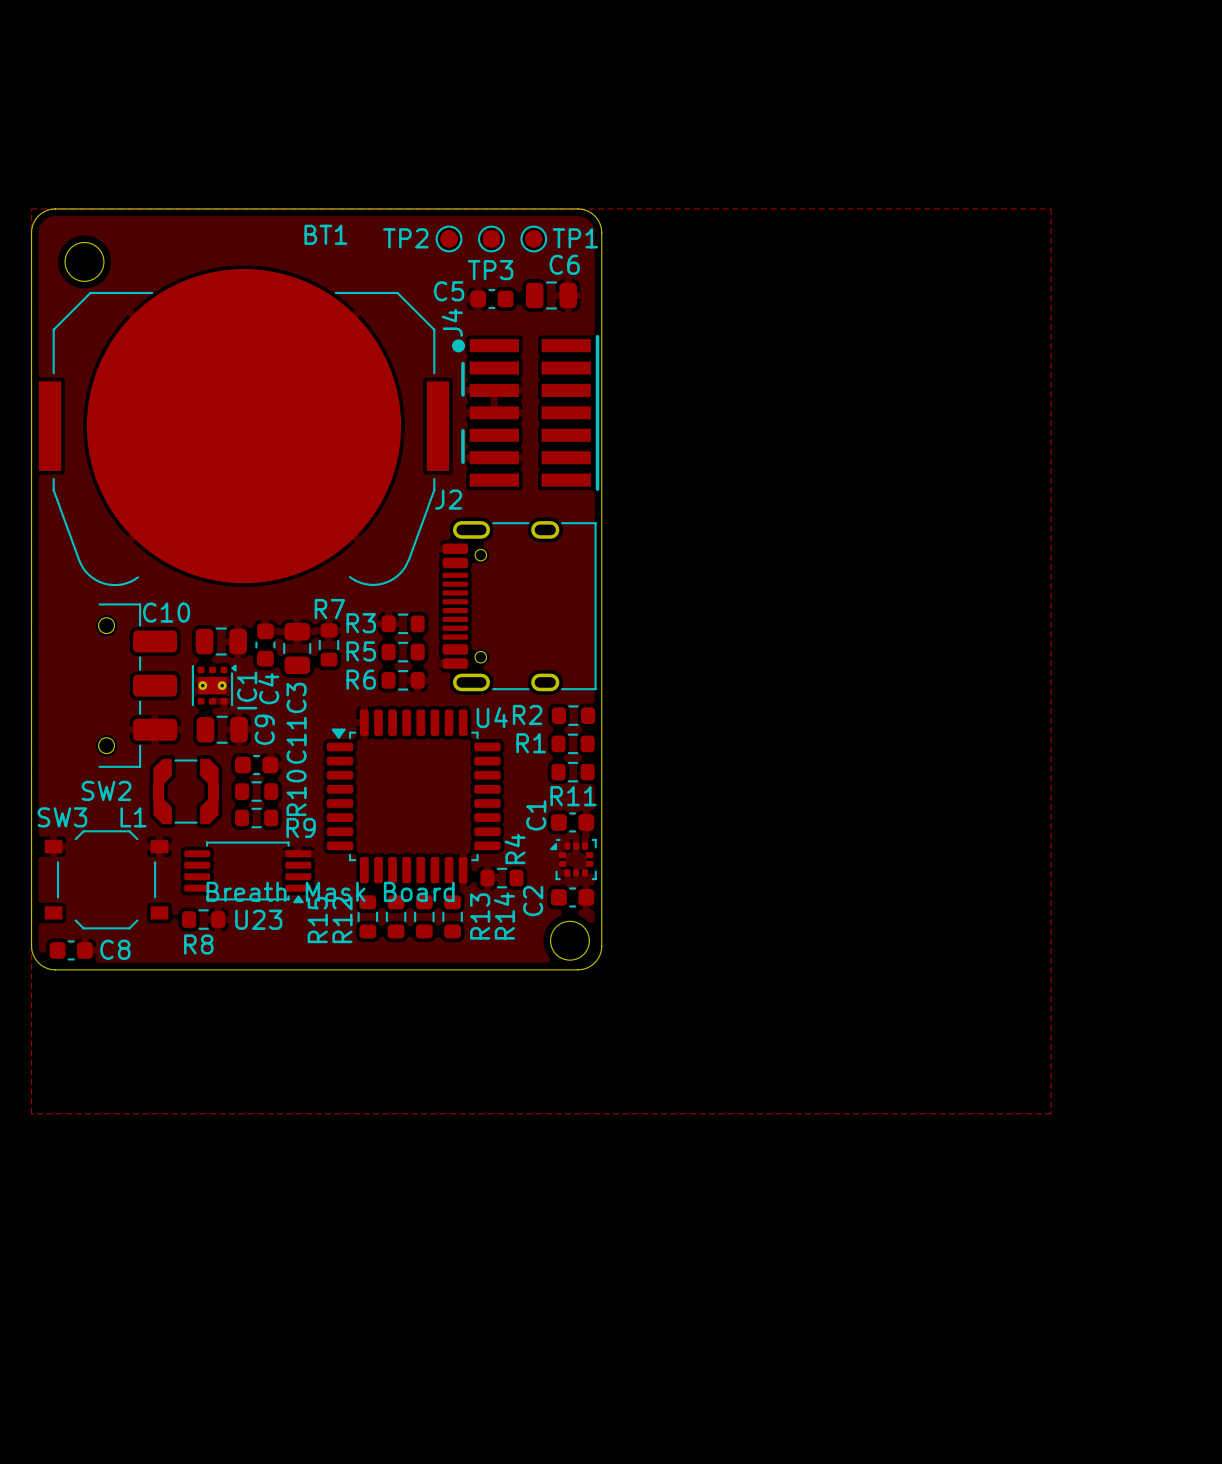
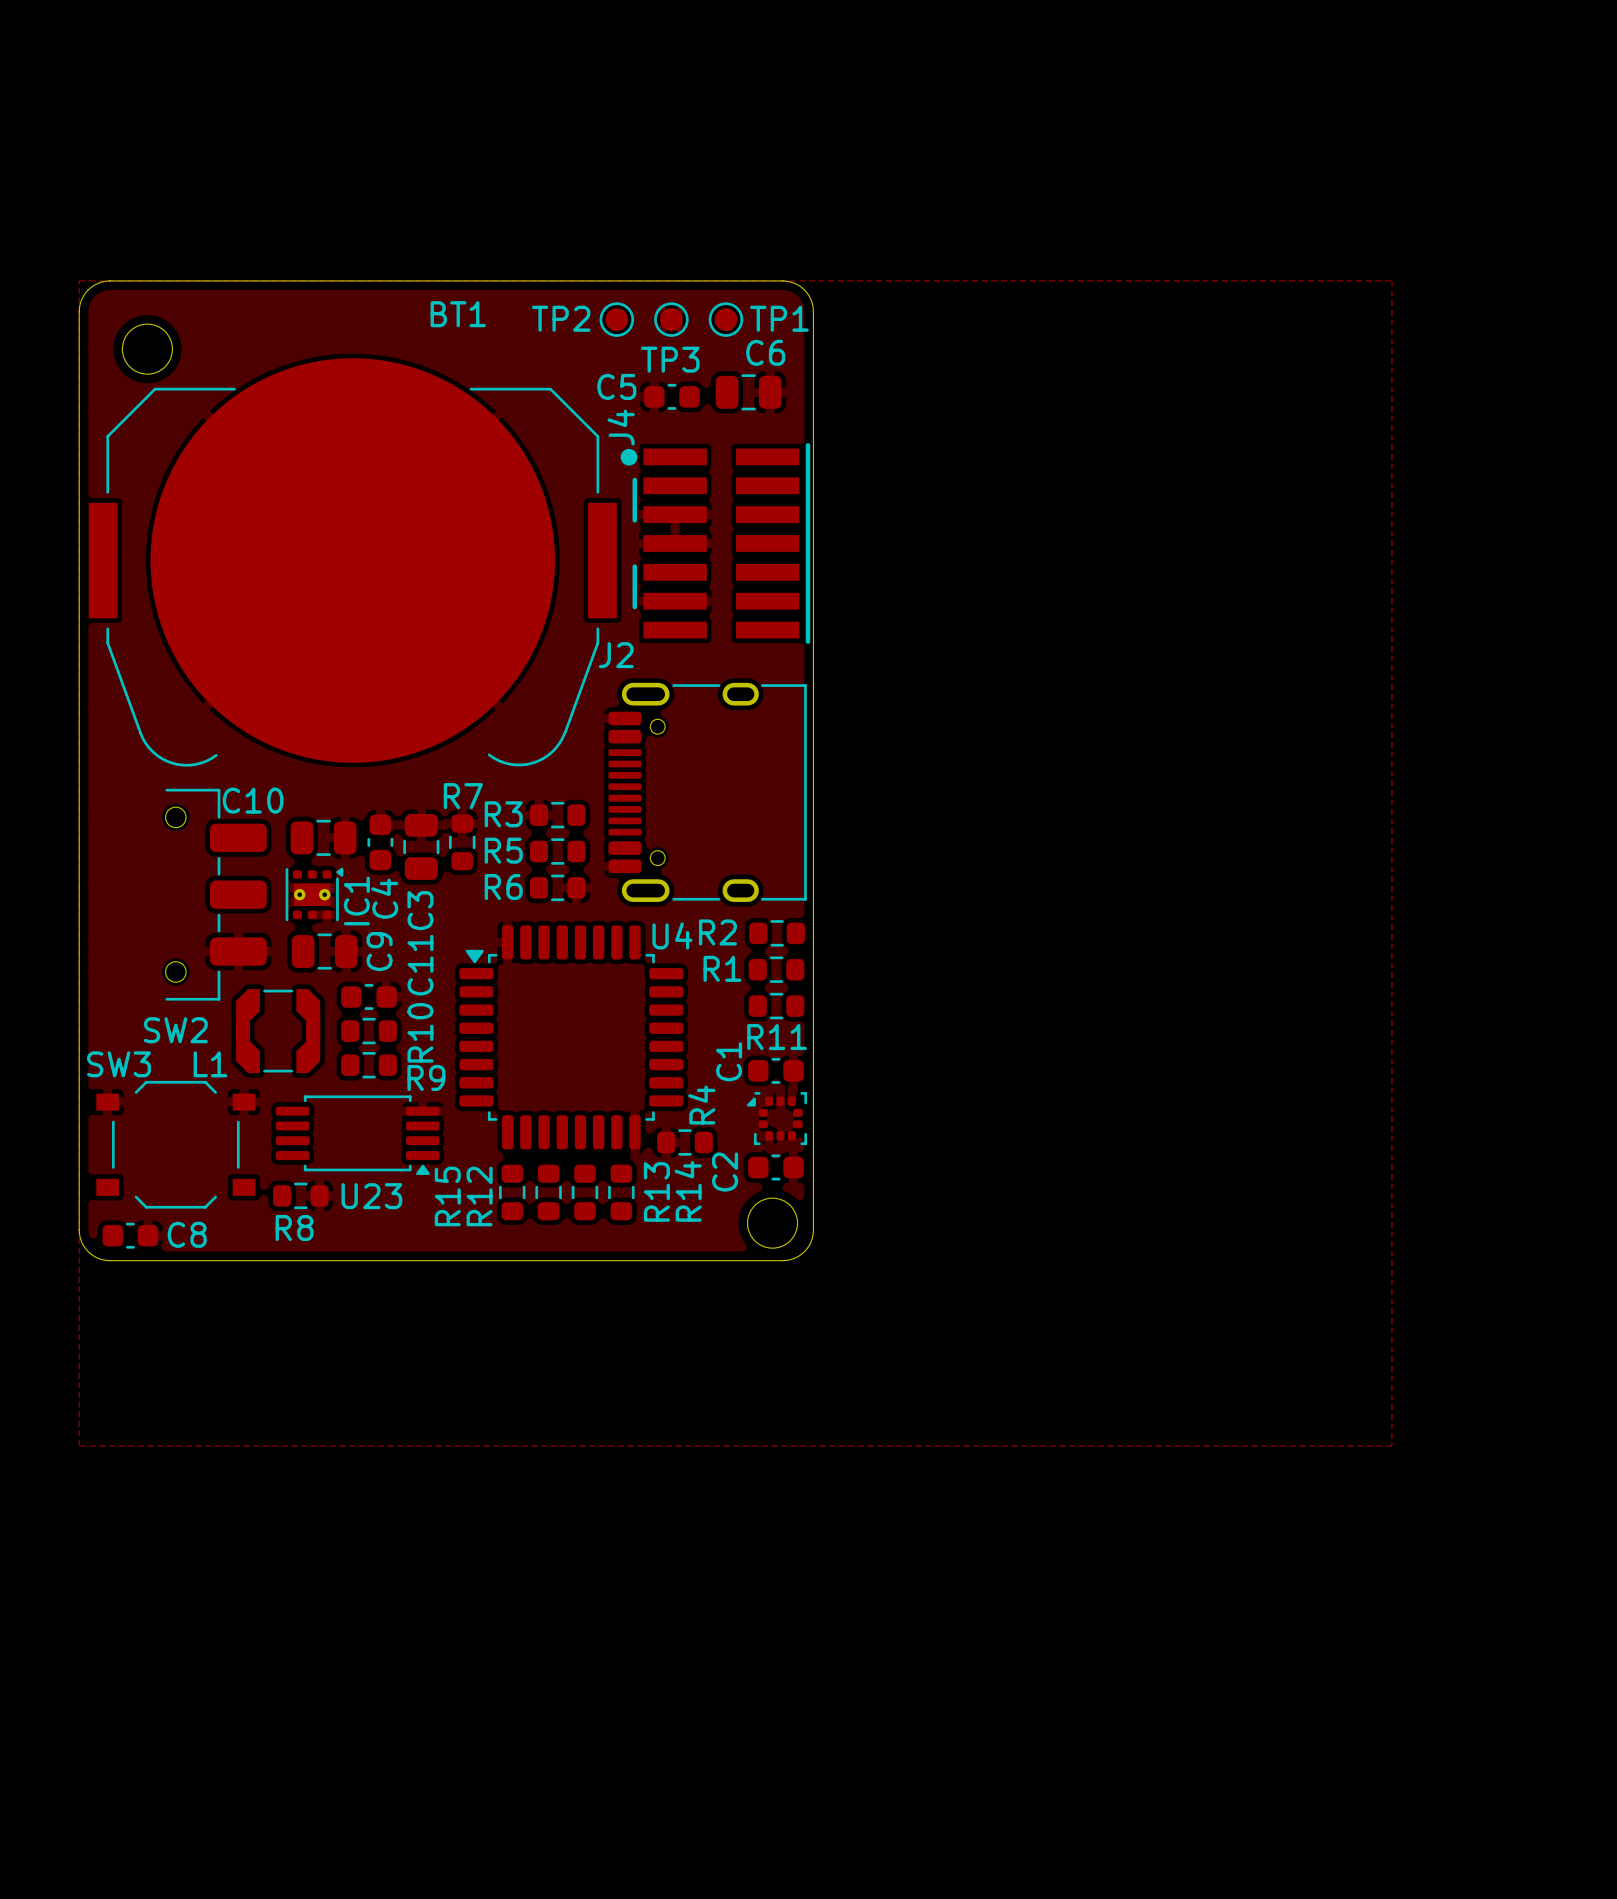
text: Breath Mask Board (330, 891) -> none

